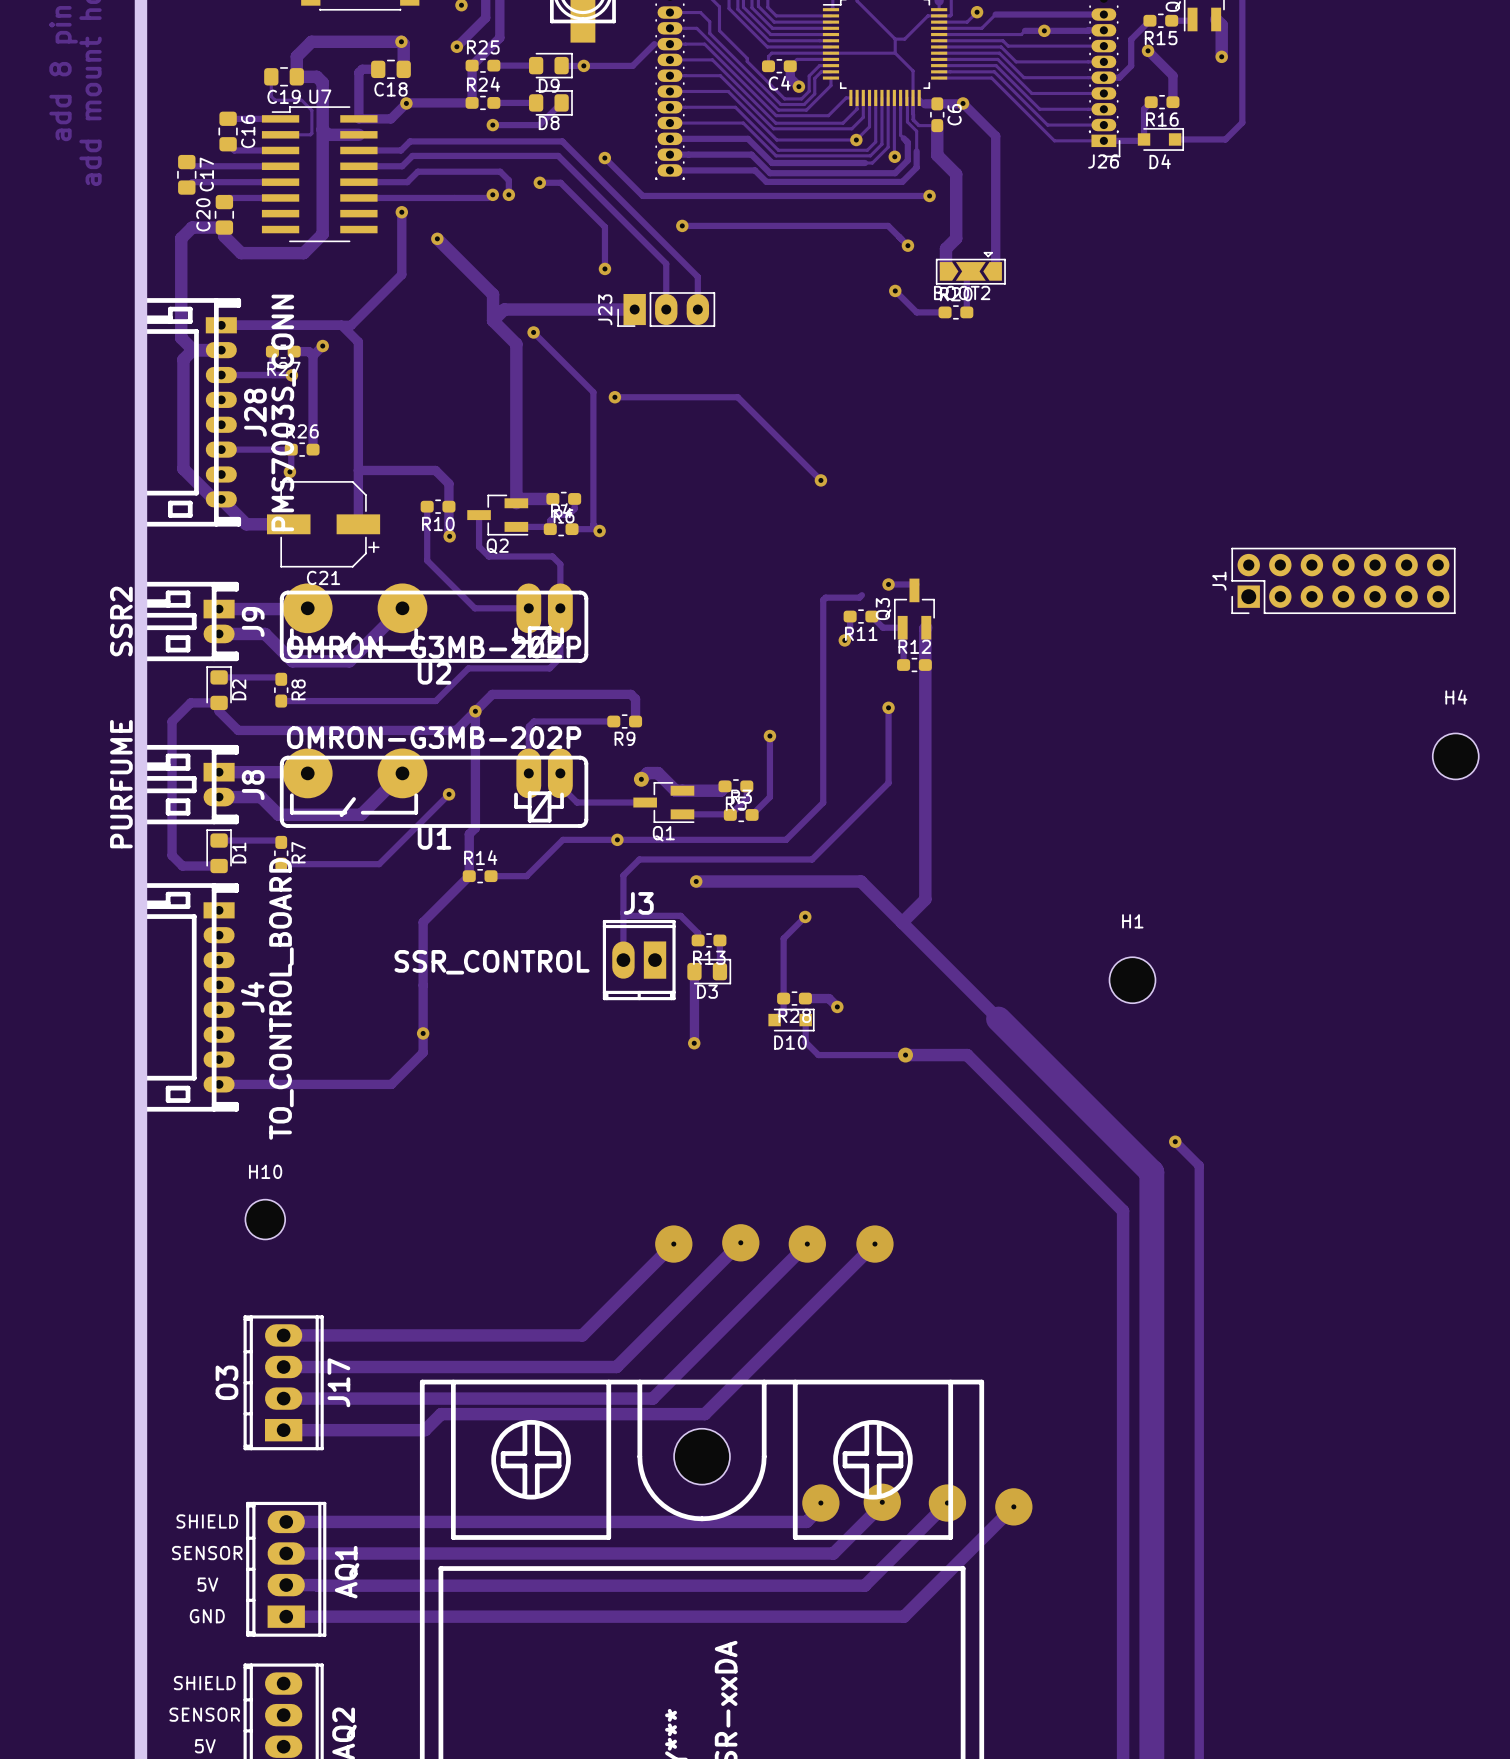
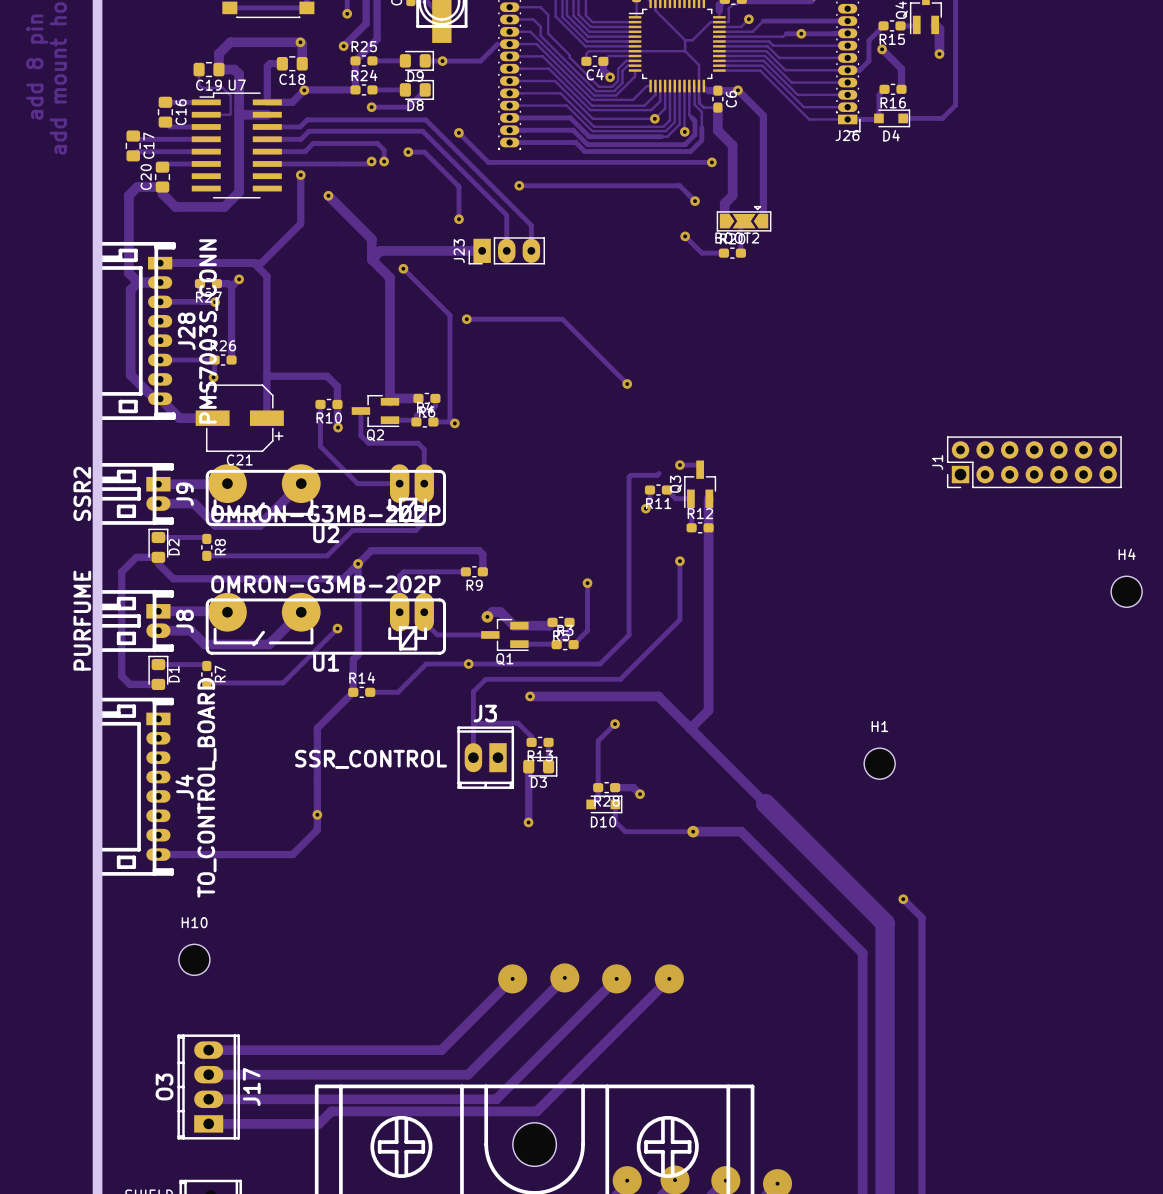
H4 footprint: [1432, 733, 1479, 780] -> [1111, 576, 1143, 608]
H1 footprint: [1109, 957, 1156, 1004] -> [864, 748, 896, 780]

